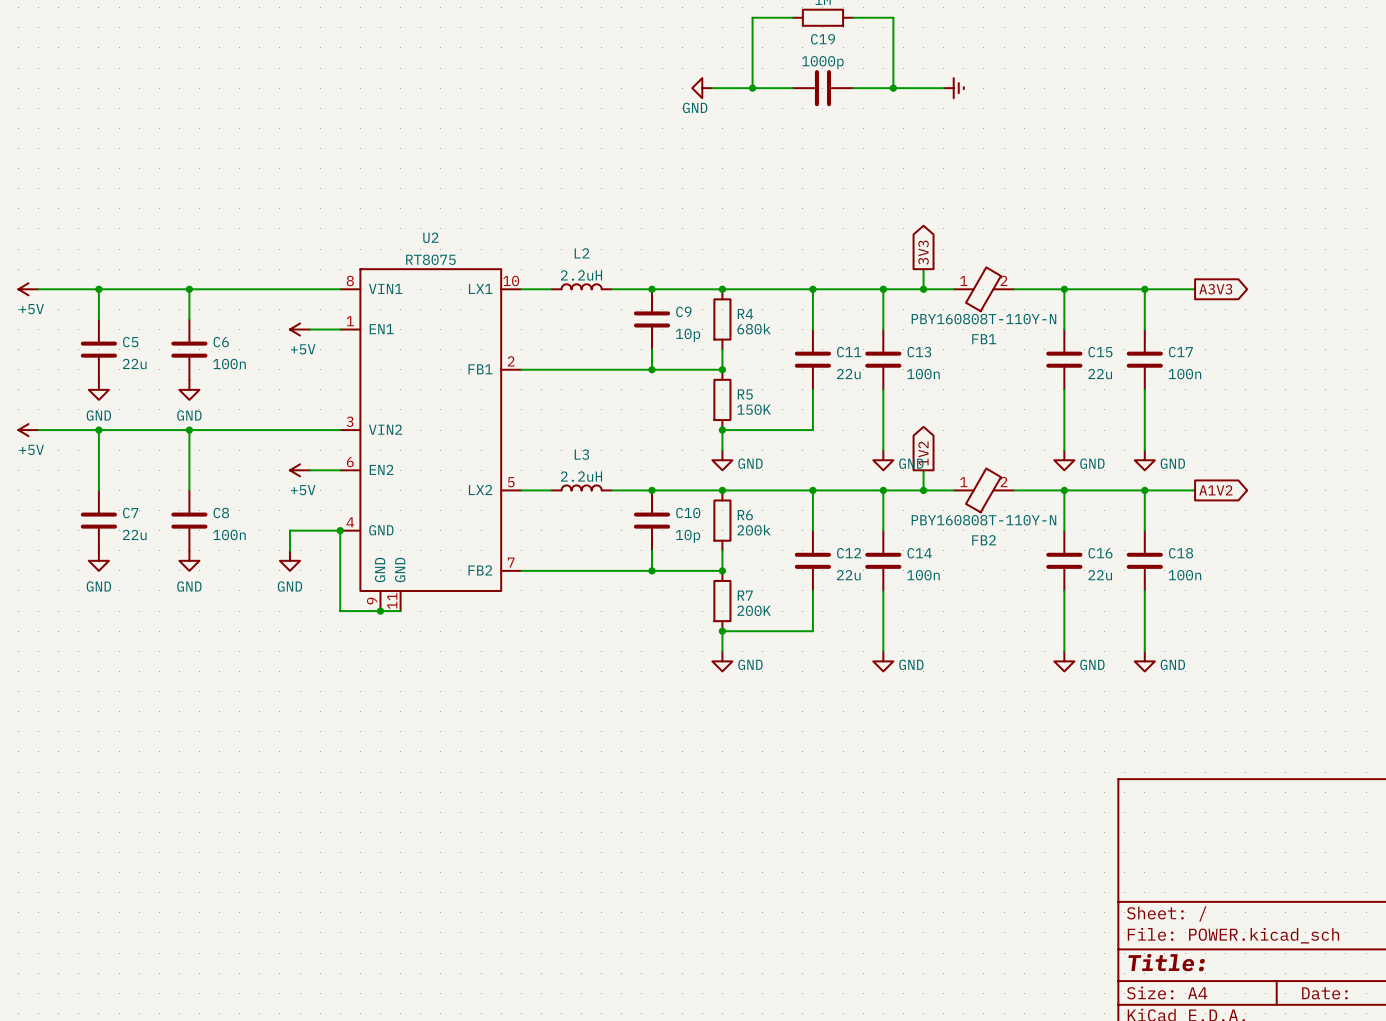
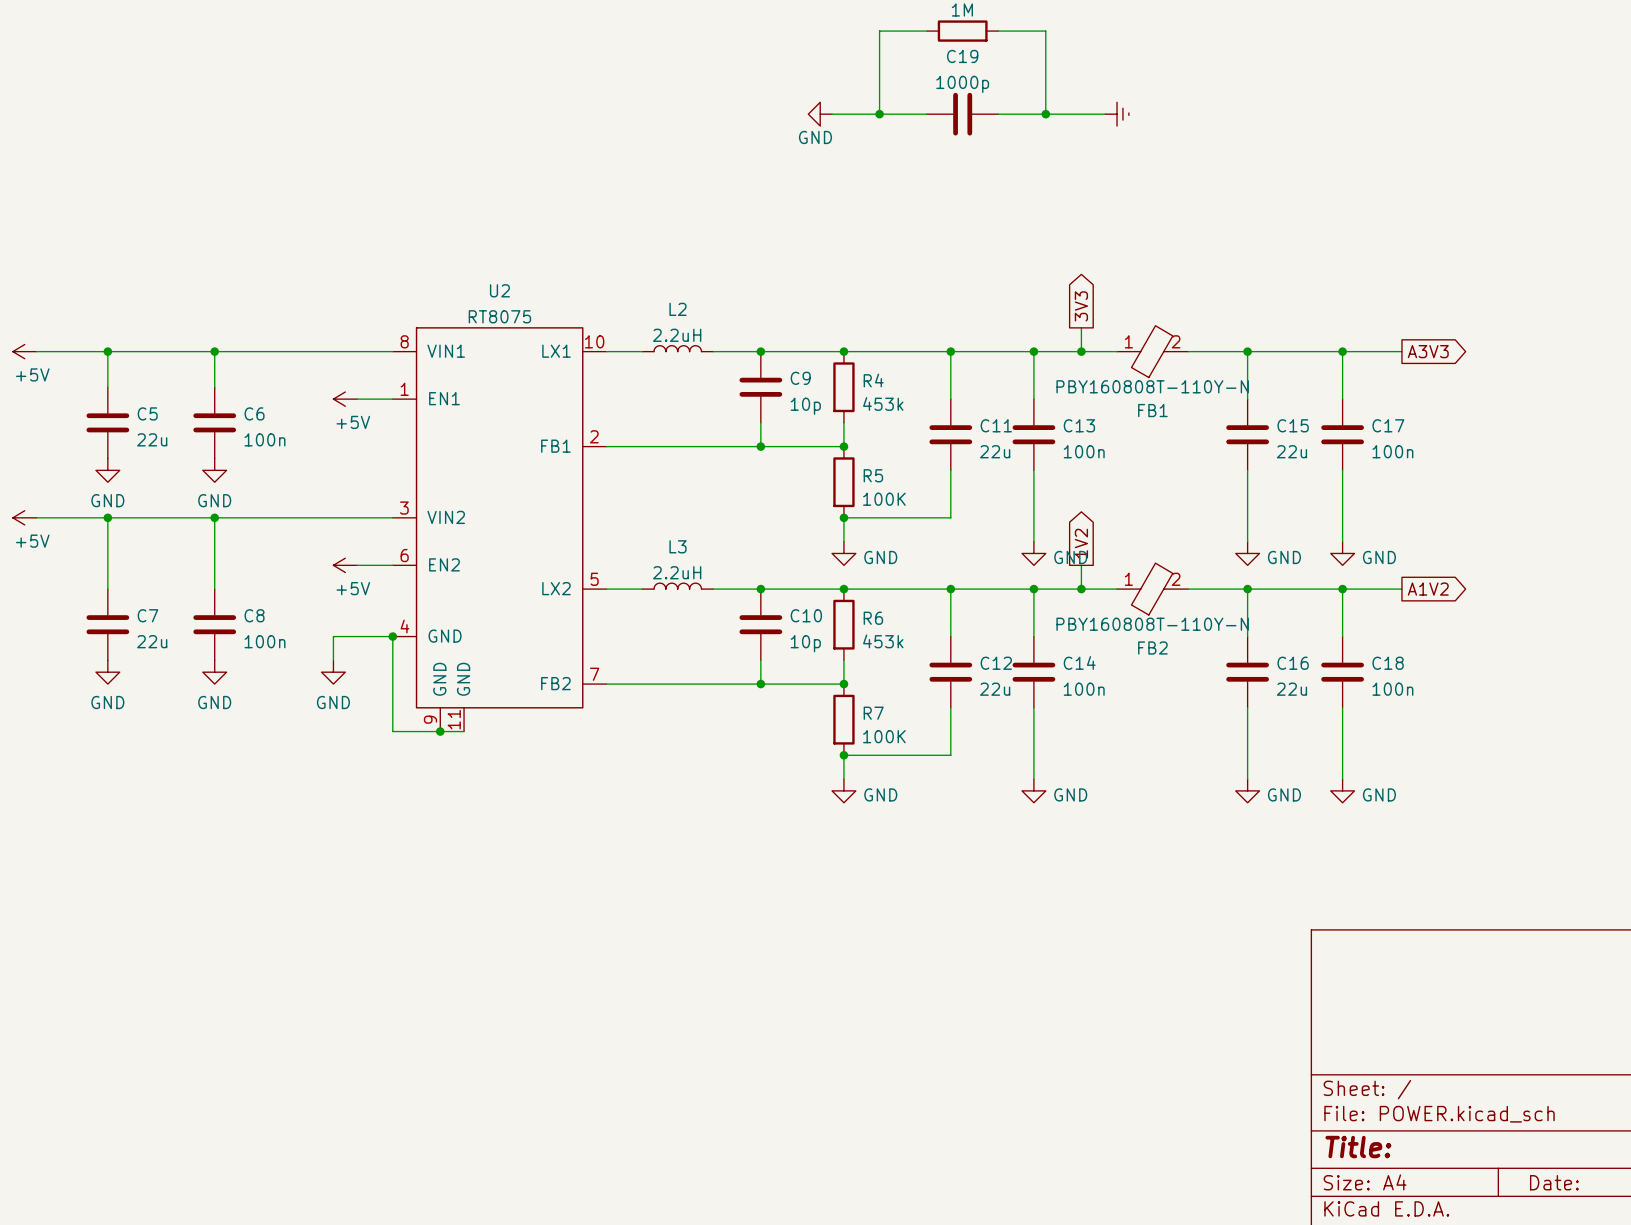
R4 value: 680k (754, 328) -> 453k (883, 403)
R5 value: 150K (754, 409) -> 100K (884, 499)
R6 value: 200k (754, 530) -> 453k (883, 641)
R7 value: 200K (754, 610) -> 100K (884, 736)

